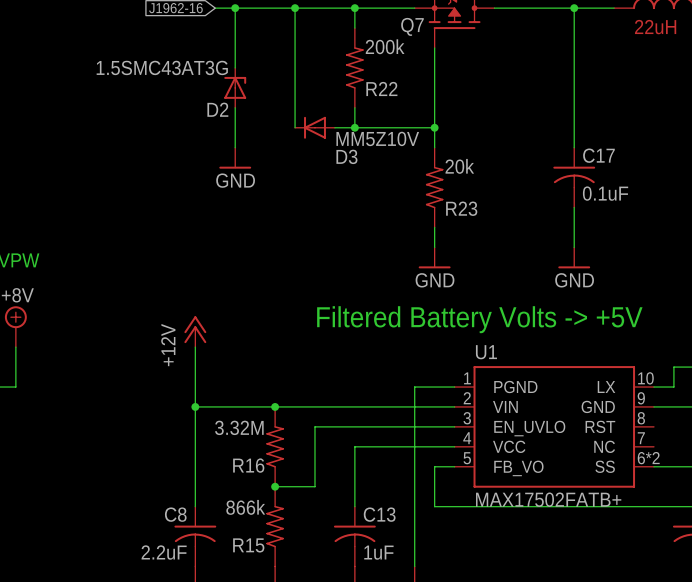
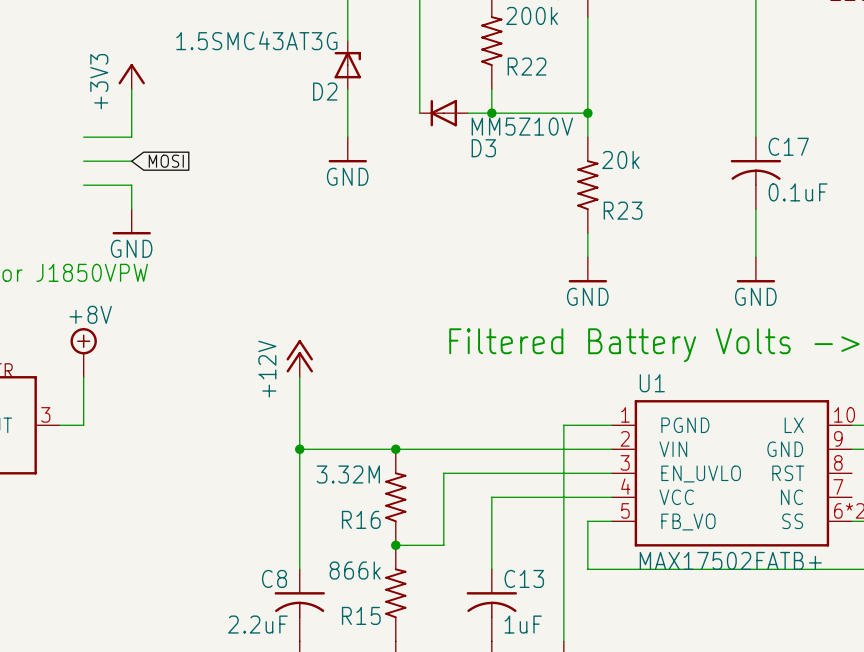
power symbol: none -> +3V3 (131, 76)
wire: none -> (131, 89) (131, 137) (83, 137)
wire: none -> (83, 161) (131, 161)
global label: none -> MOSI (166, 161)
wire: none -> (83, 185) (131, 185) (131, 209)
power symbol: none -> GND (131, 221)

